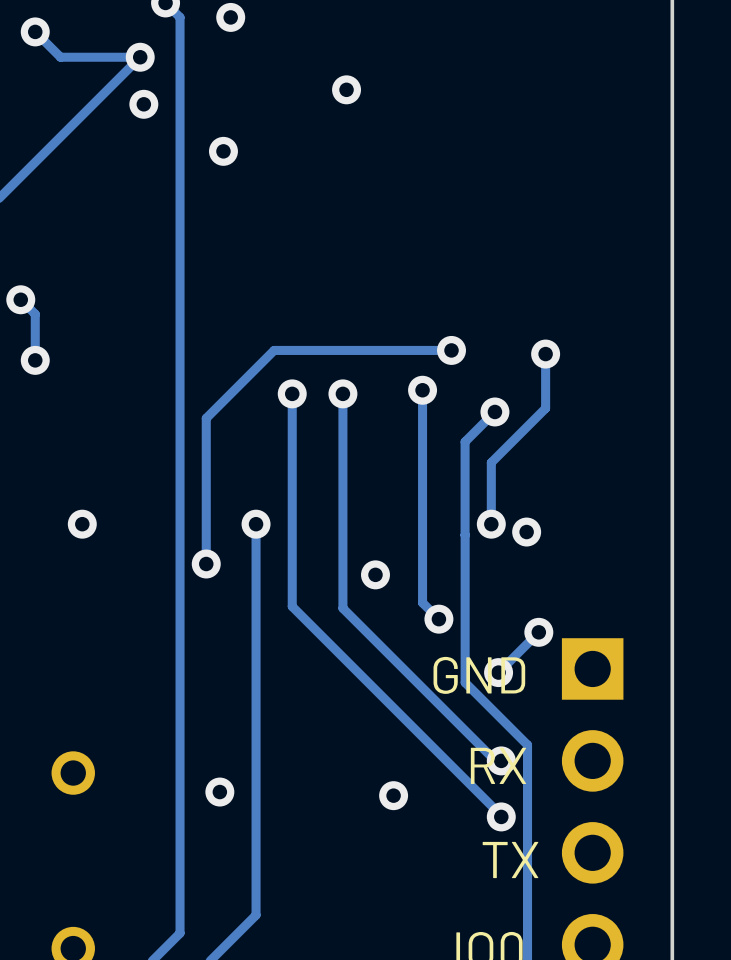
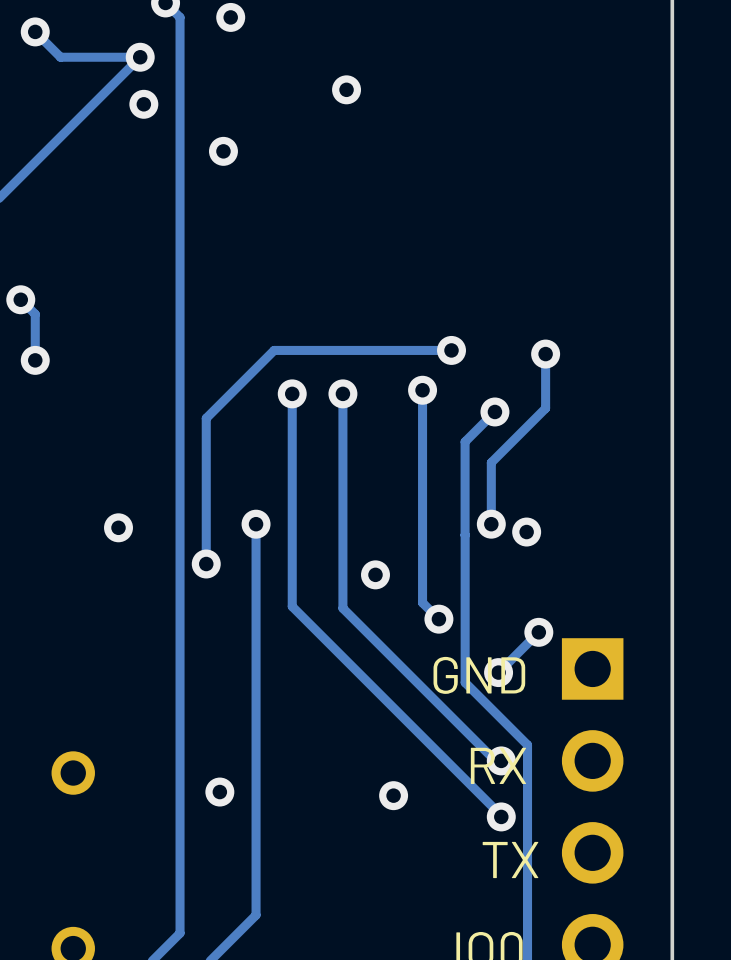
via position: (82, 524) -> (118, 527)

